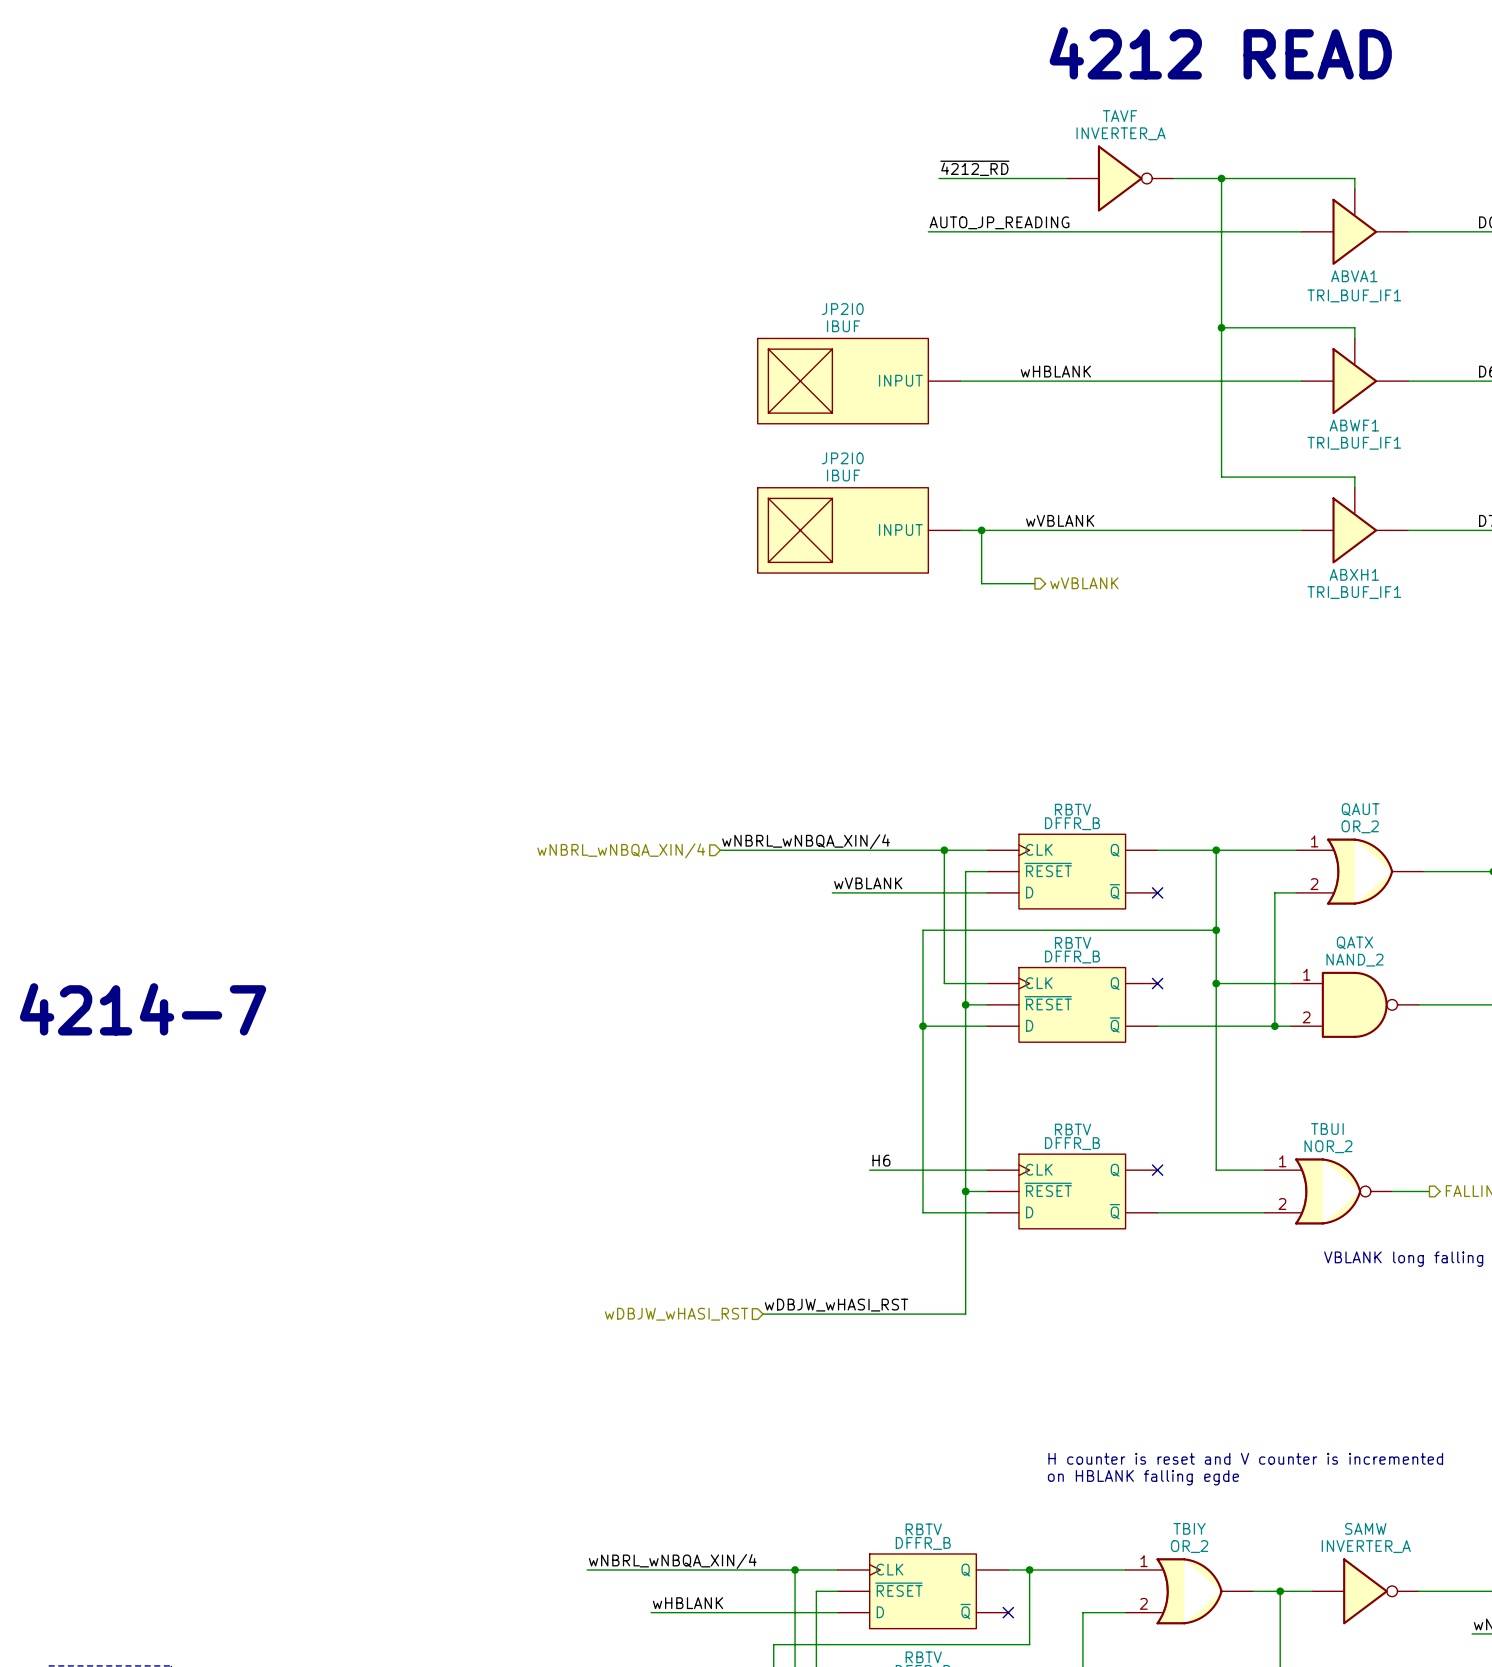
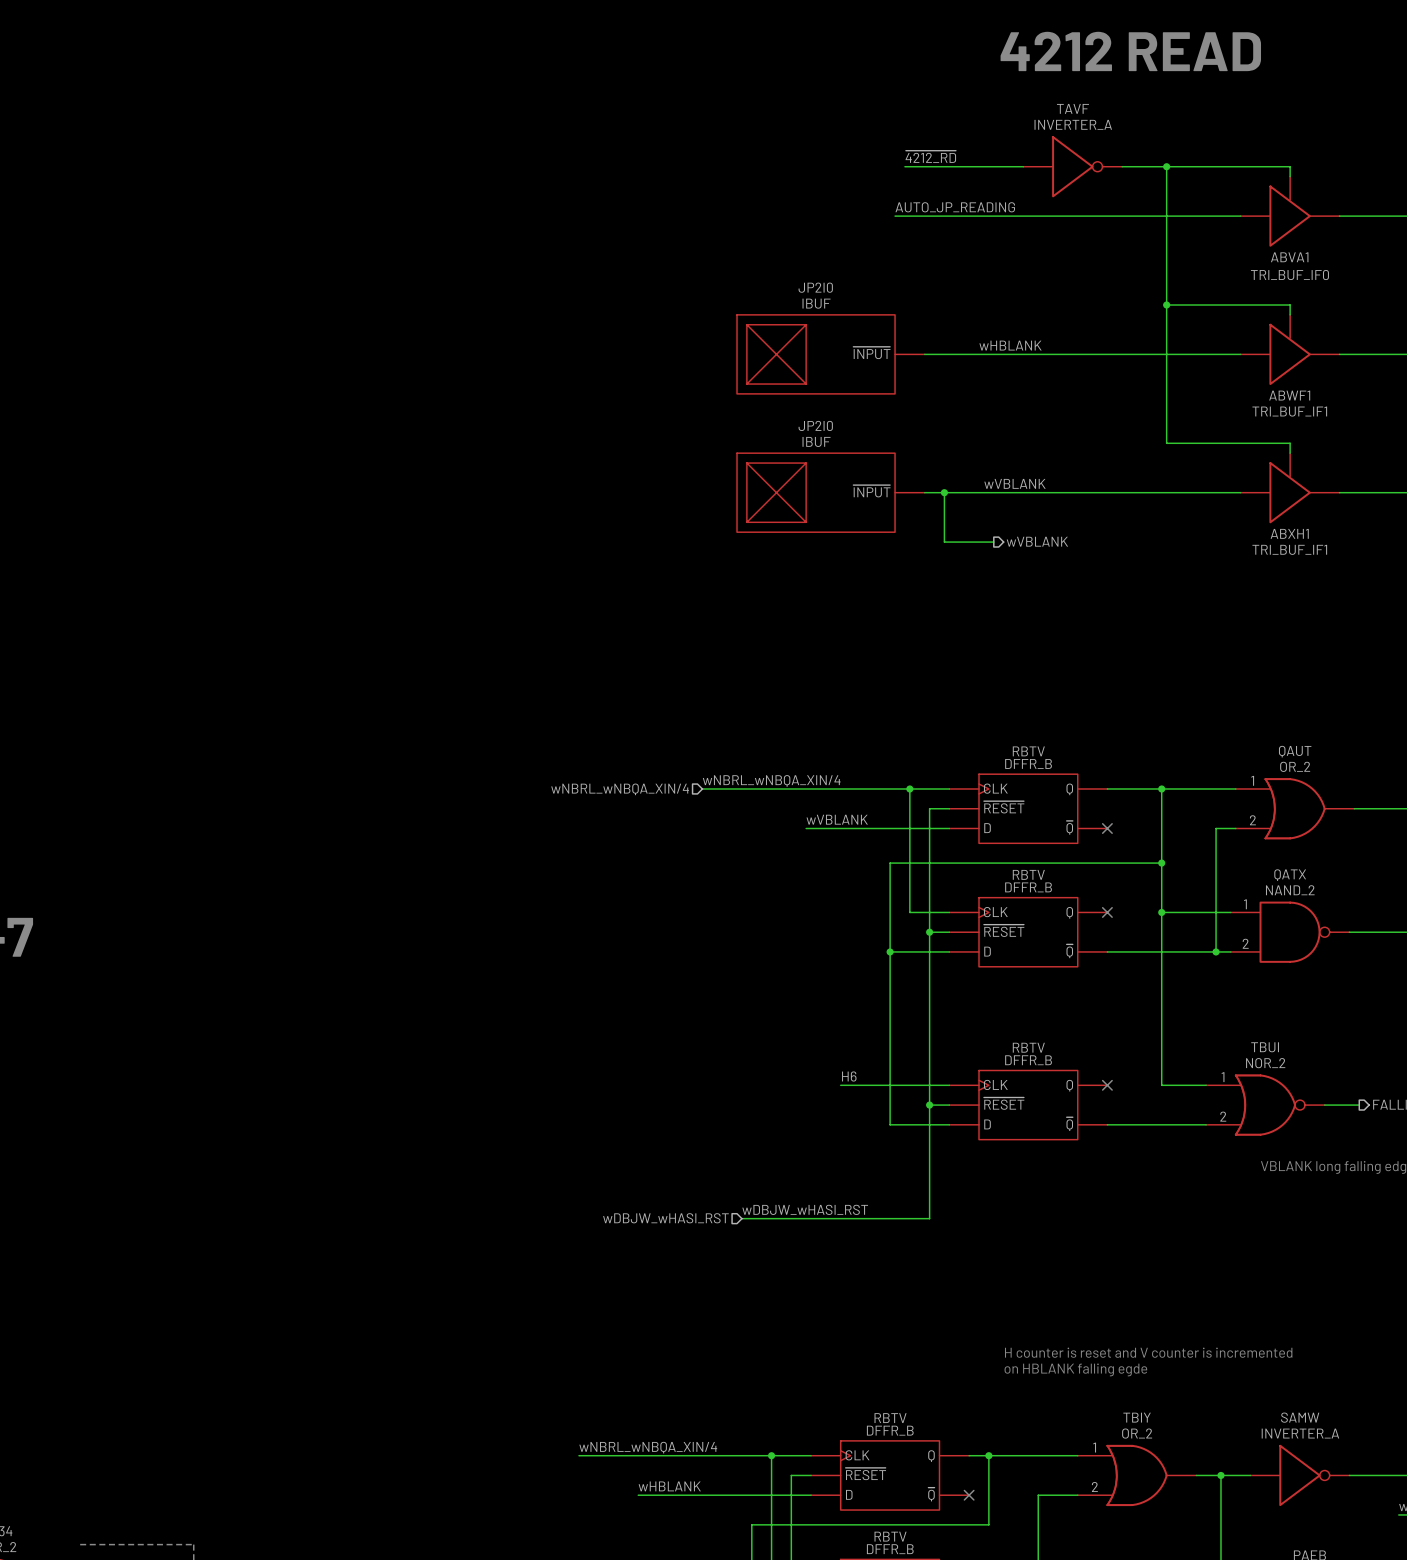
ABVA1 value: TRI_BUF_IF1 (1354, 295) -> TRI_BUF_IF0 (1289, 275)
JP2I0 pin name: INPUT (900, 380) -> ~{INPUT} (871, 352)
JP2I0 pin name: INPUT (900, 529) -> ~{INPUT} (871, 491)

